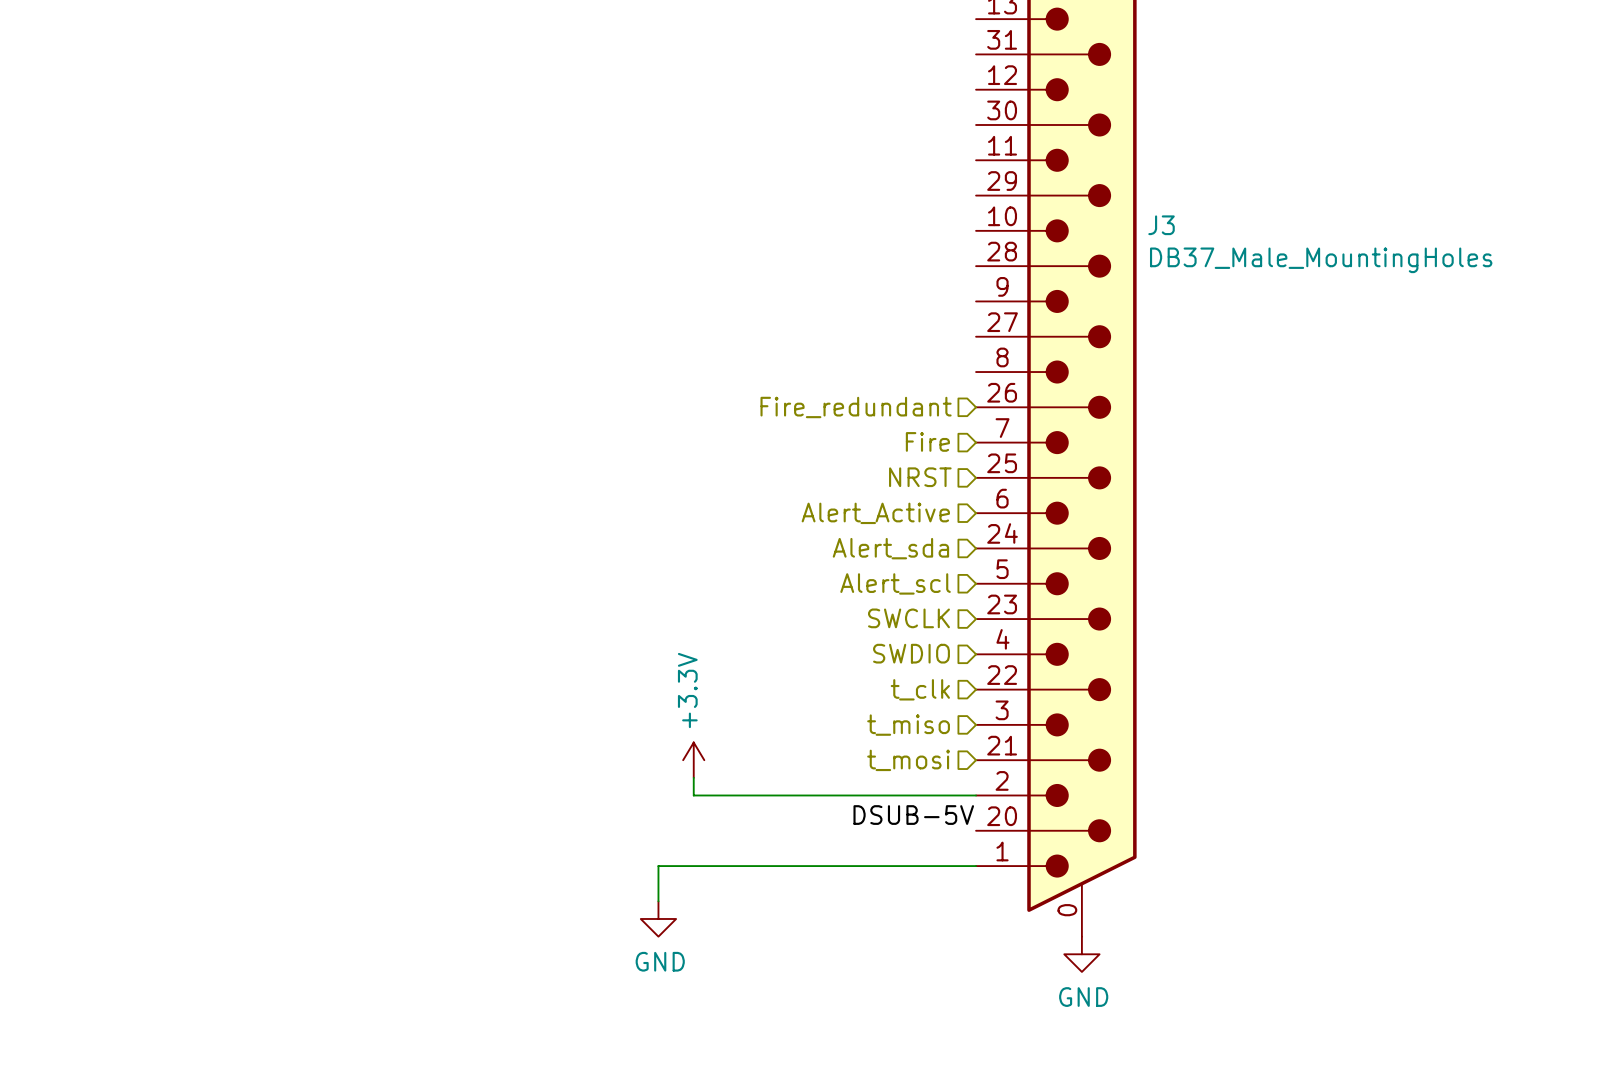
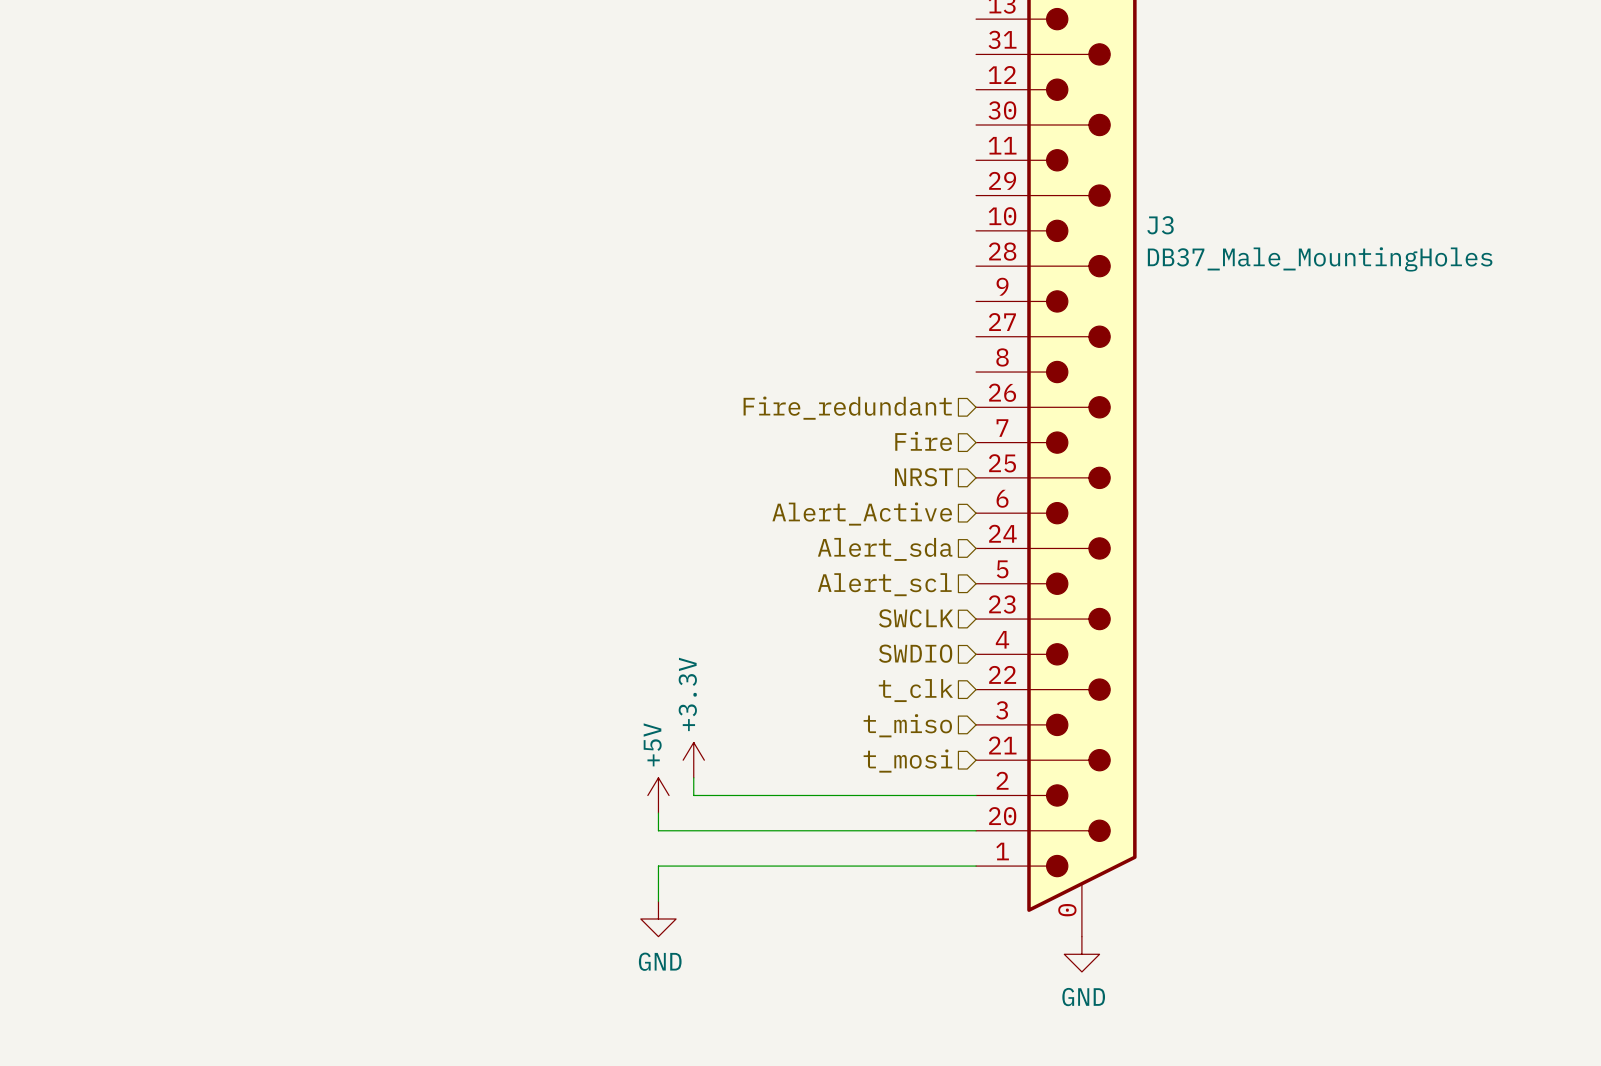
power symbol: none -> +5V (658, 795)
wire: none -> (658, 813) (658, 830) (976, 830)
label: DSUB-5V (913, 815) -> none

